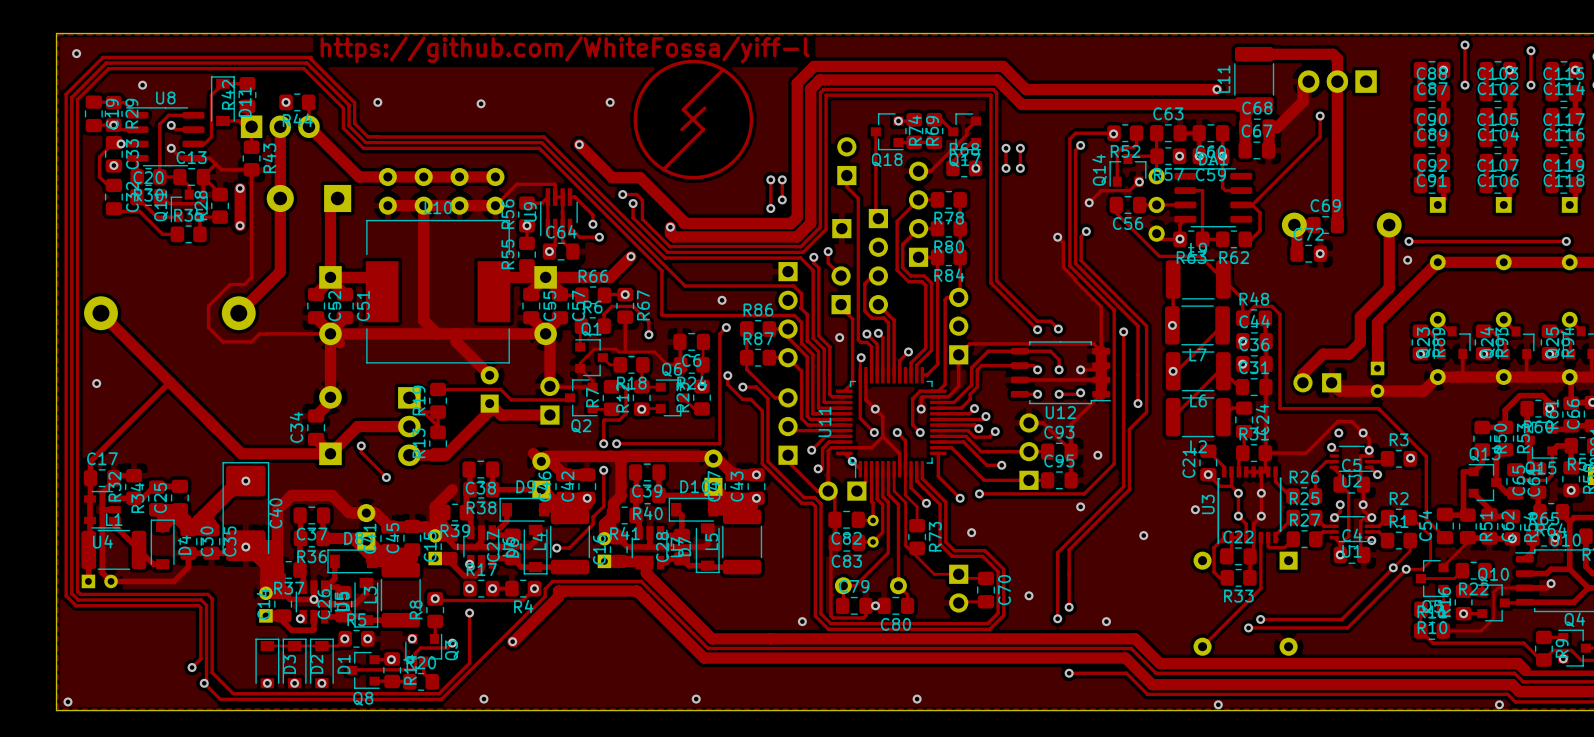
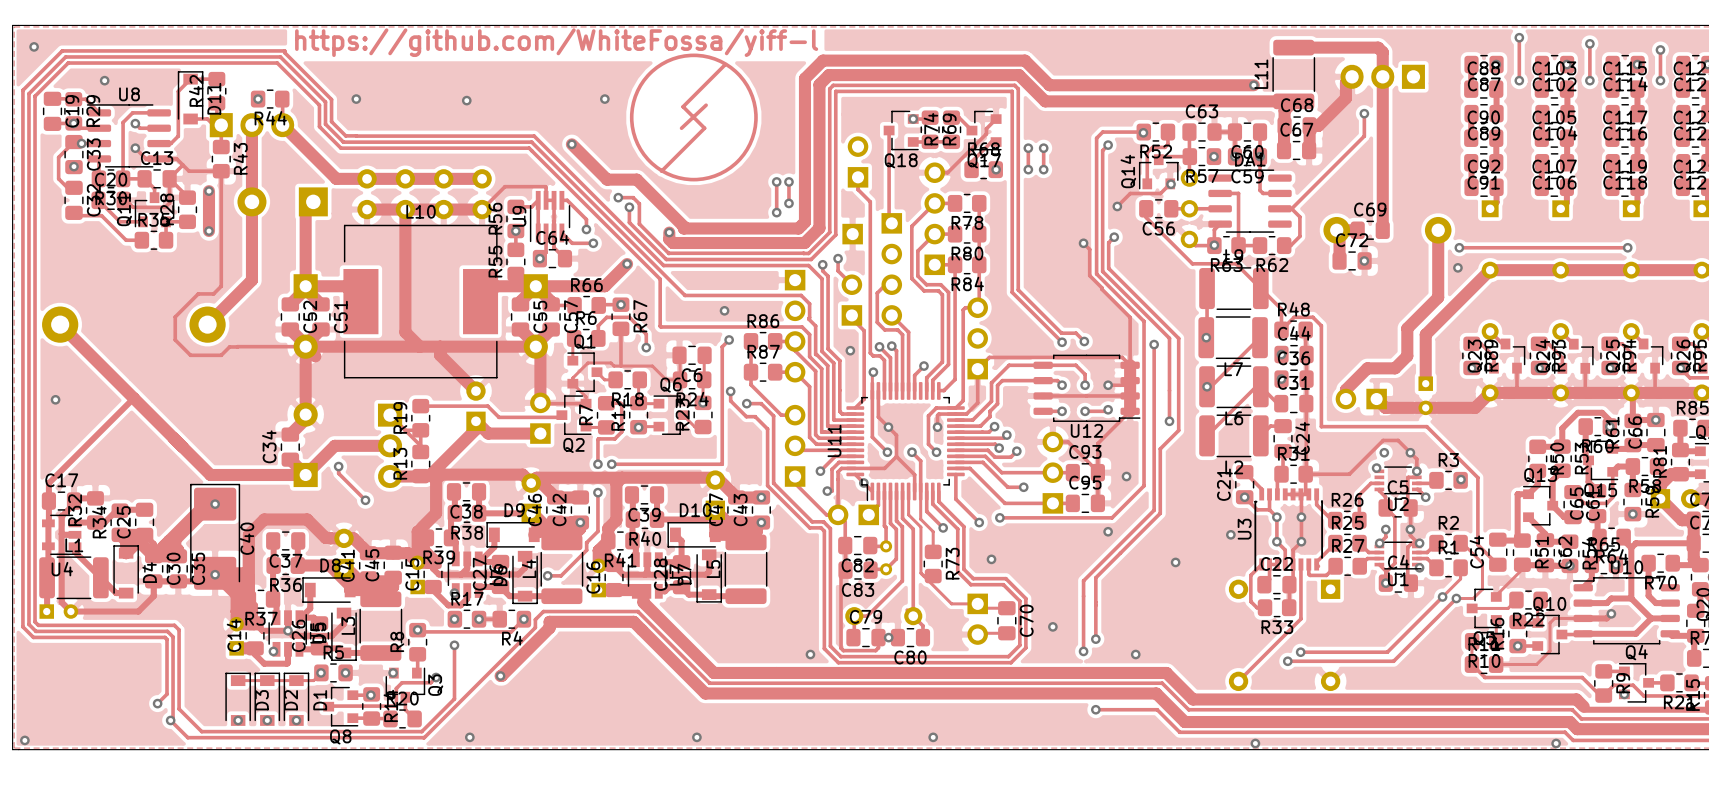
track: none -> (522, 474) (441, 474) (436, 479) (436, 513)

